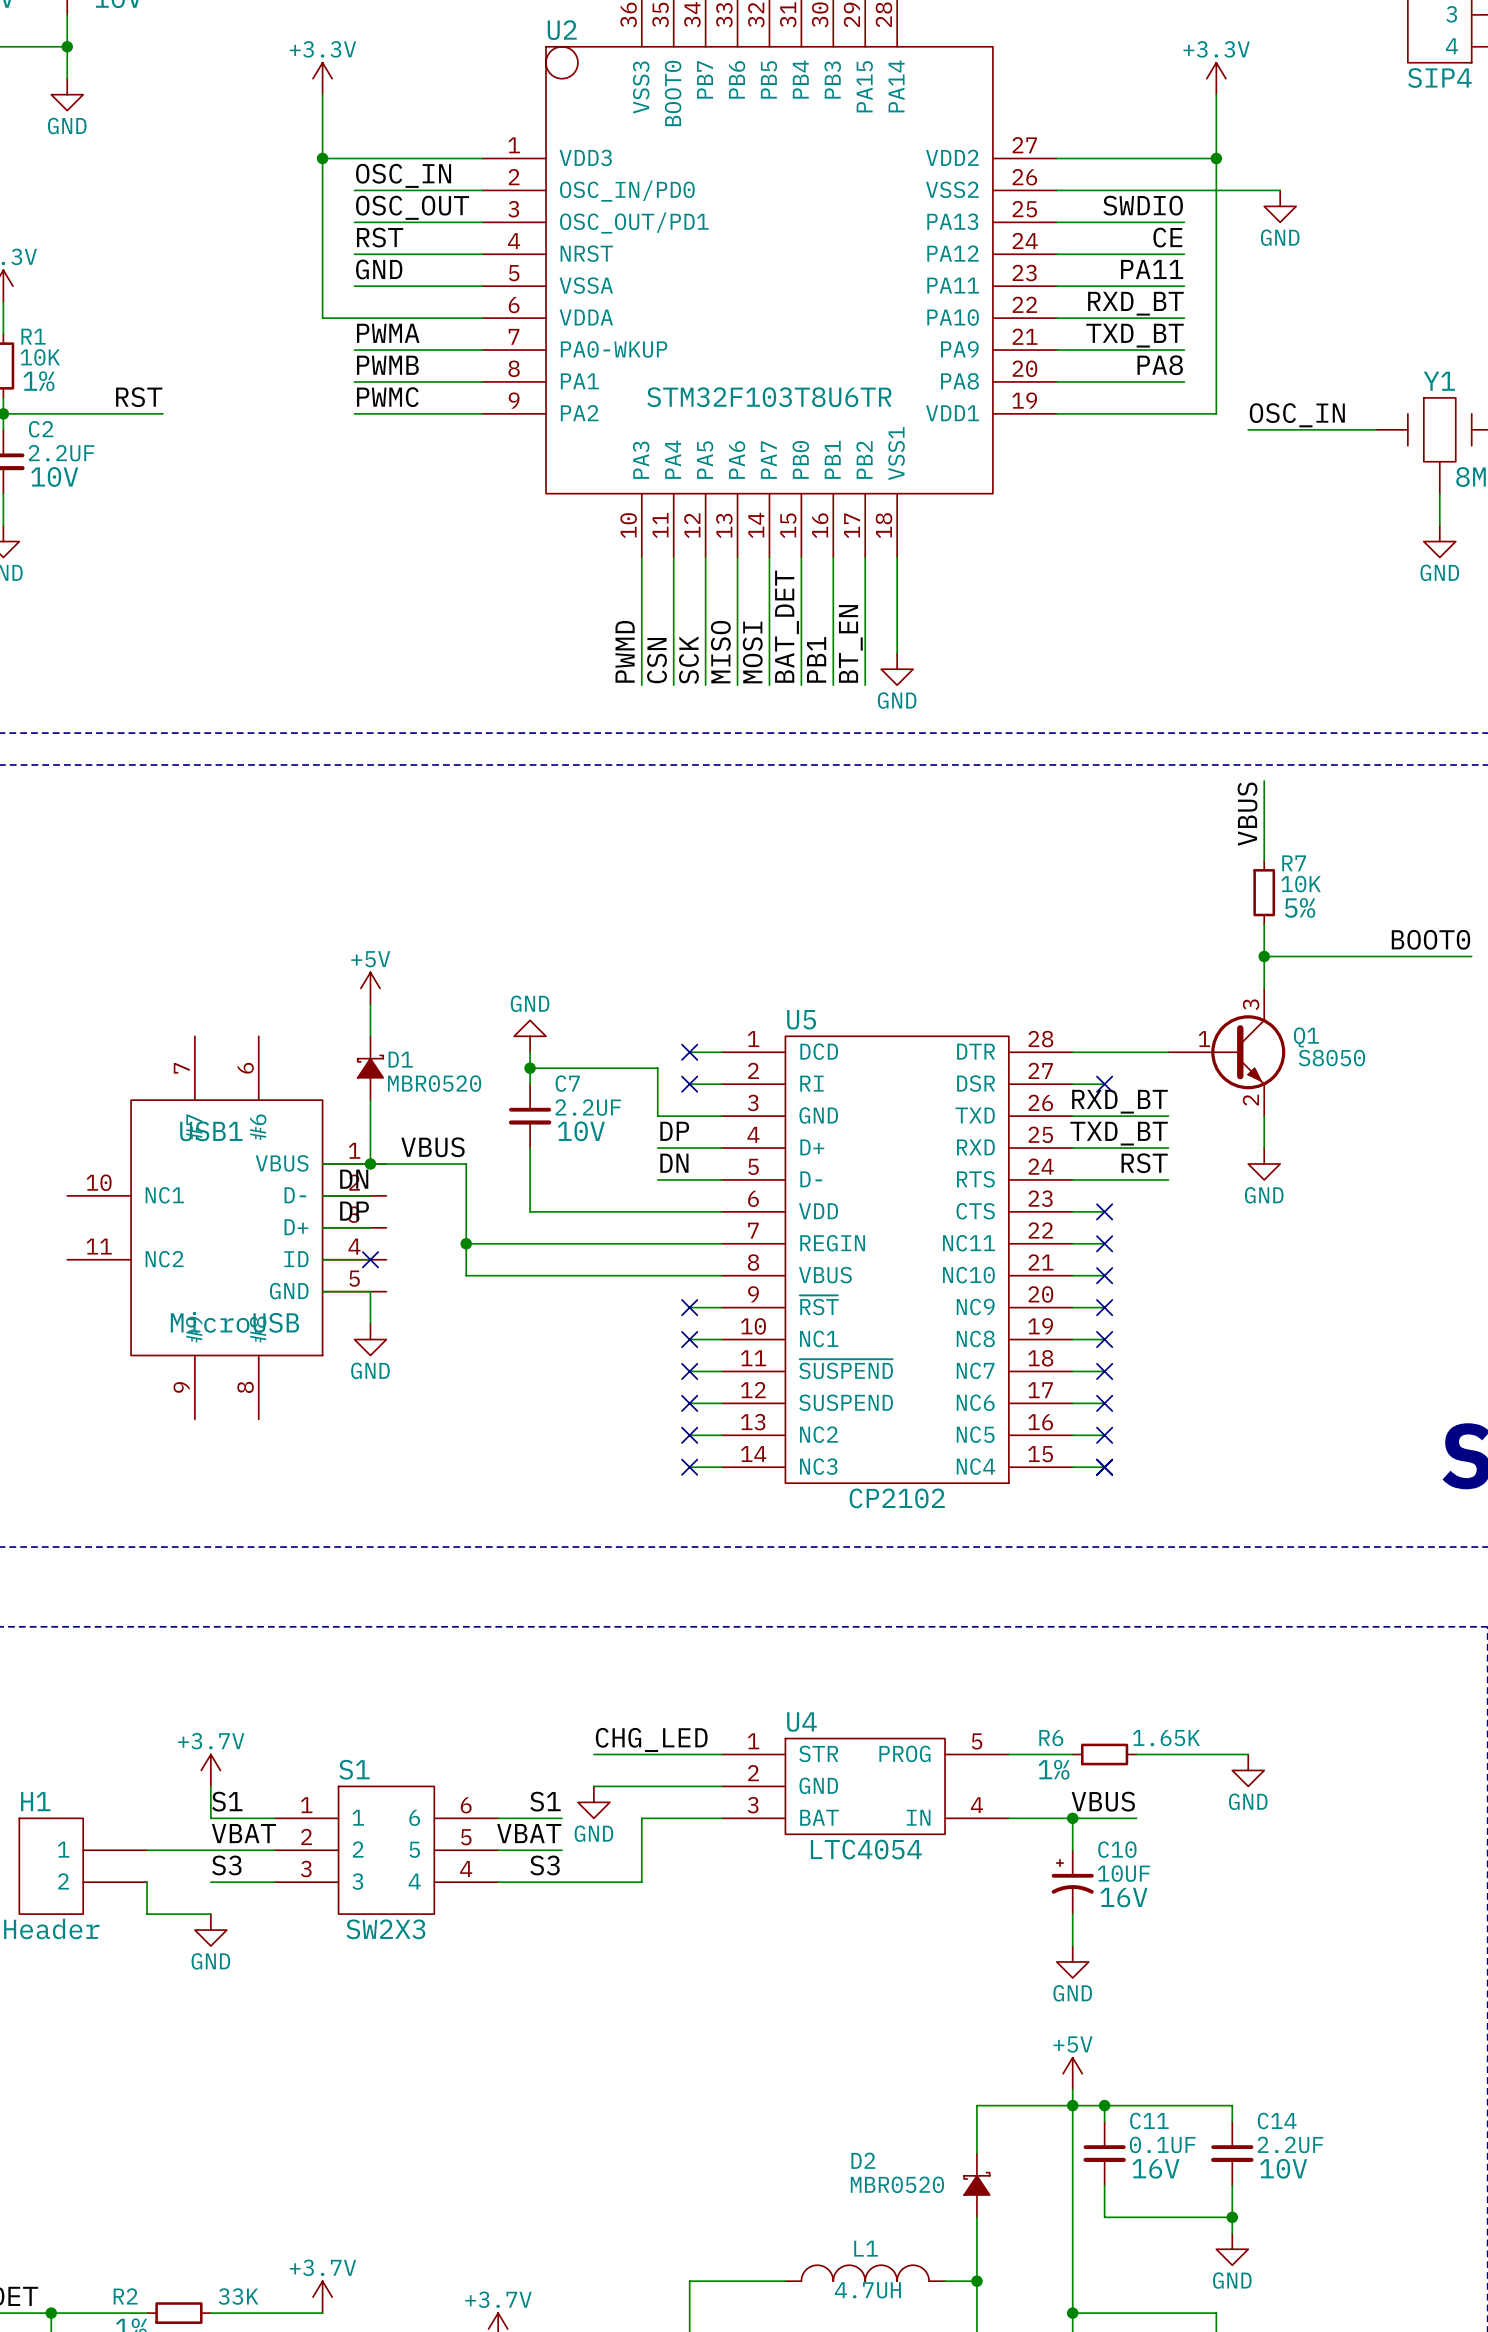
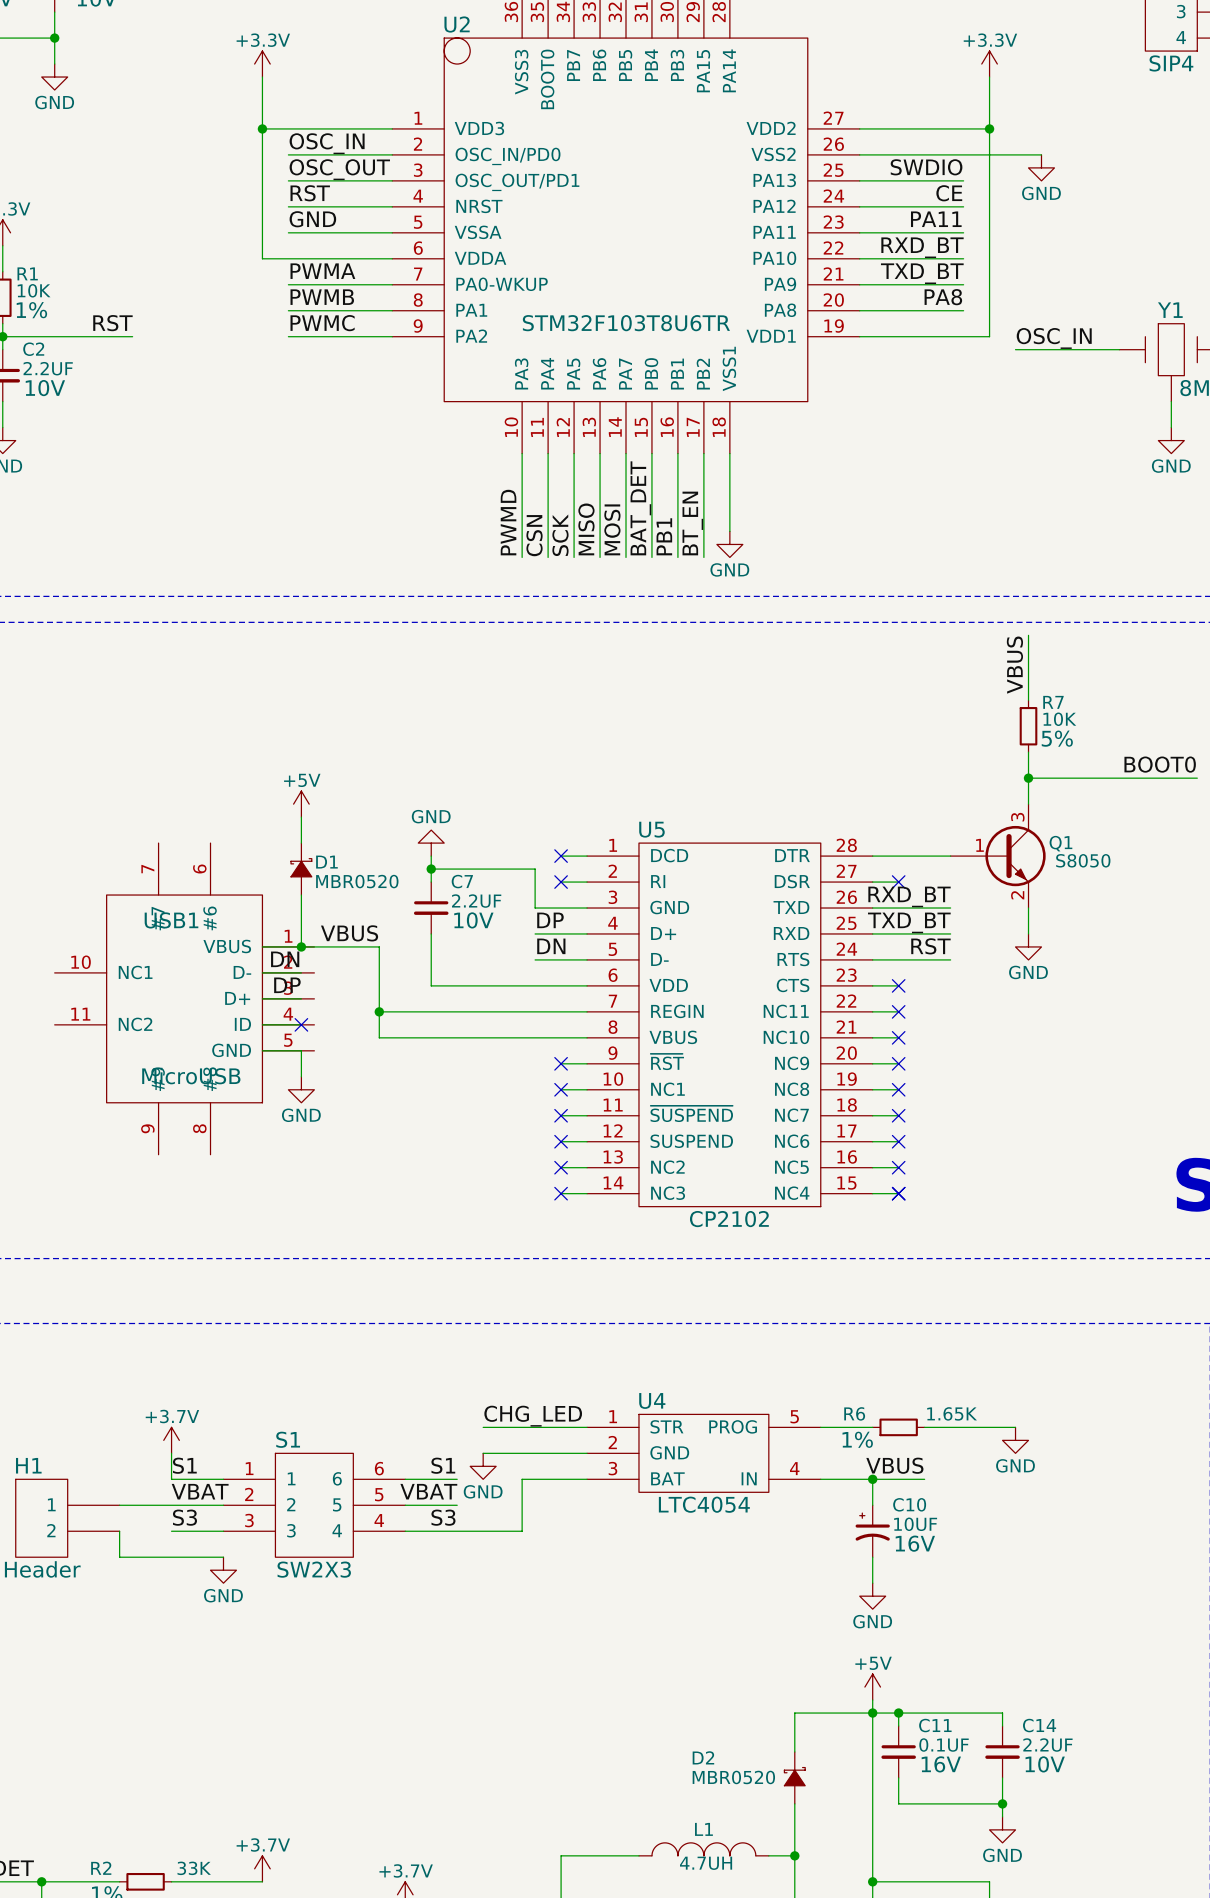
wire: none -> (171, 1557) (223, 1557)
power symbol position: GND (210, 1930) -> GND (223, 1570)

